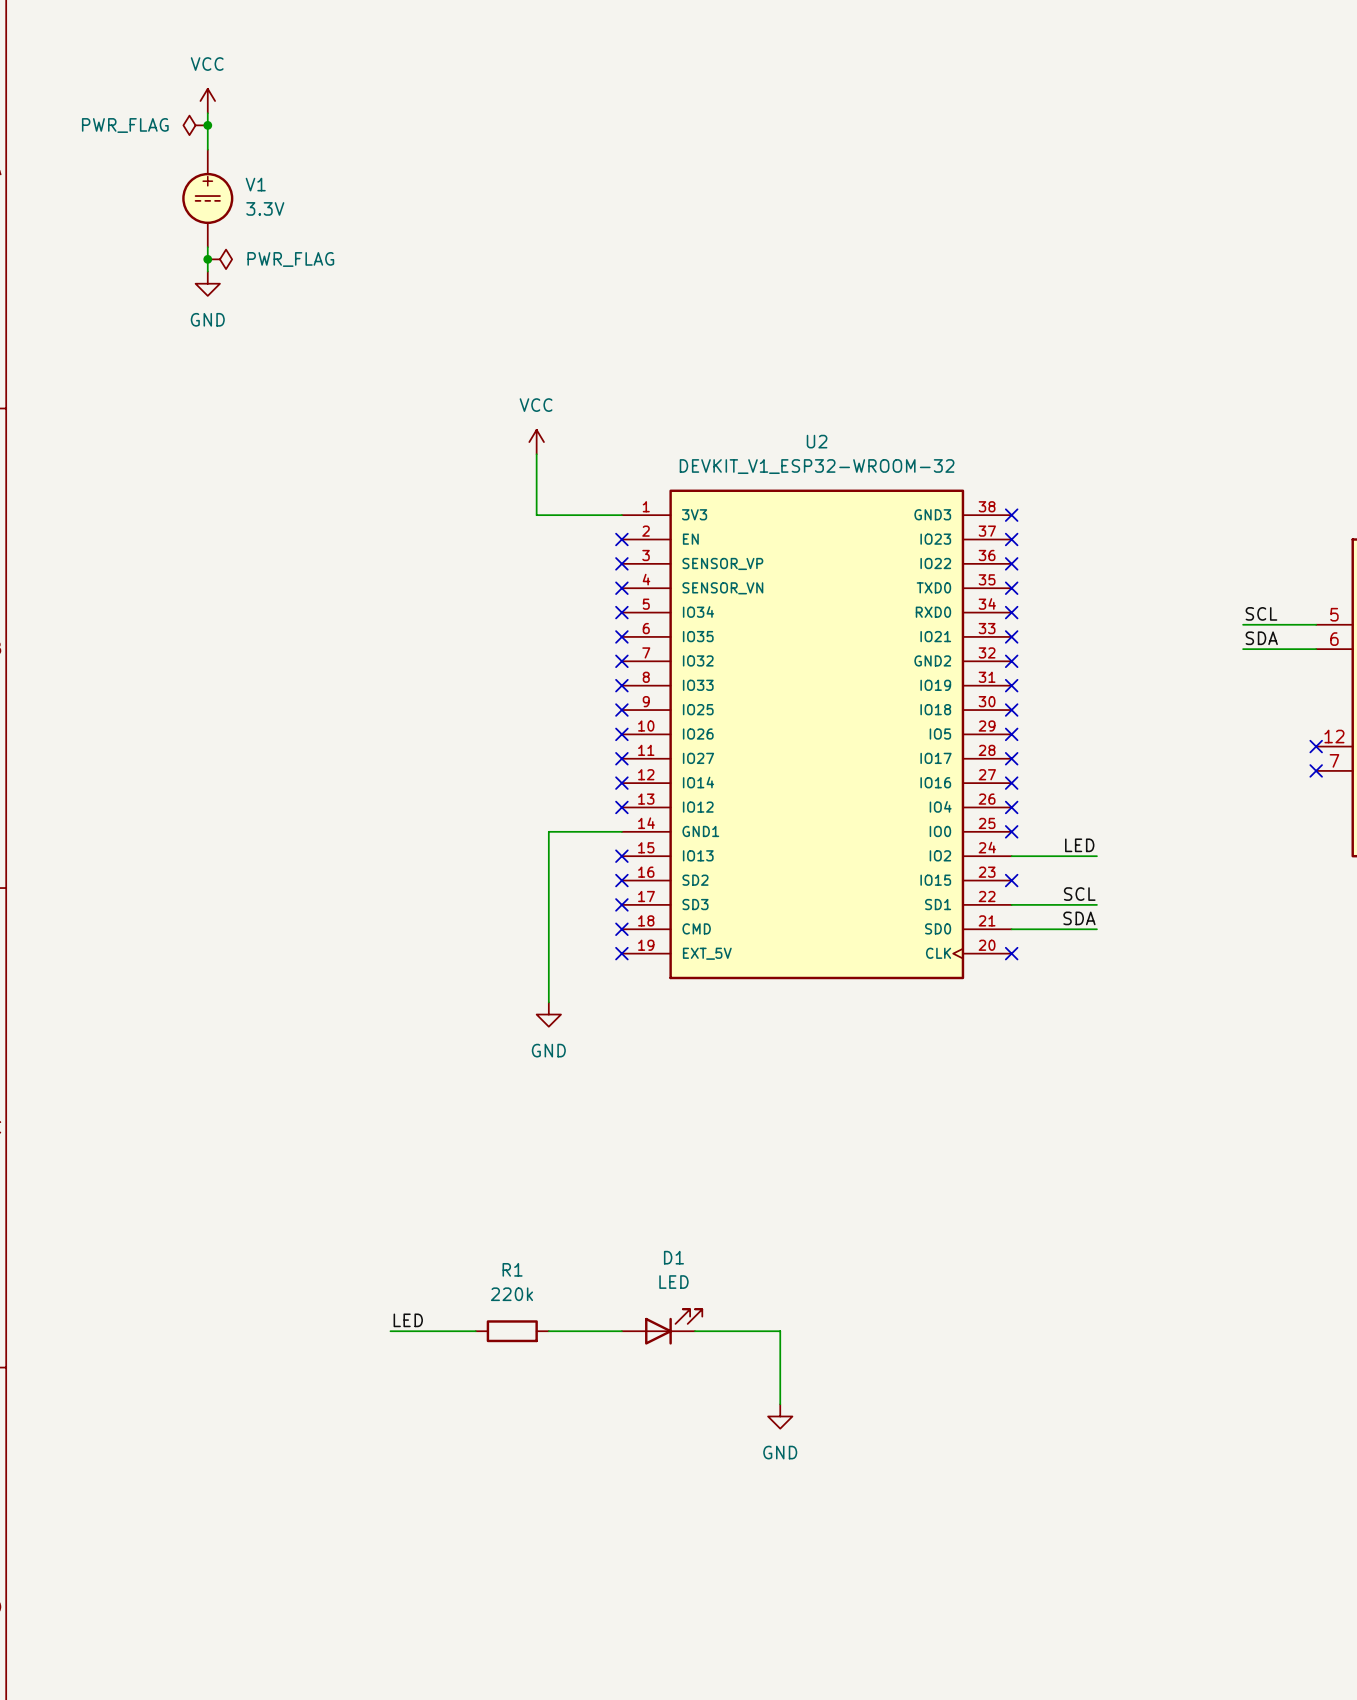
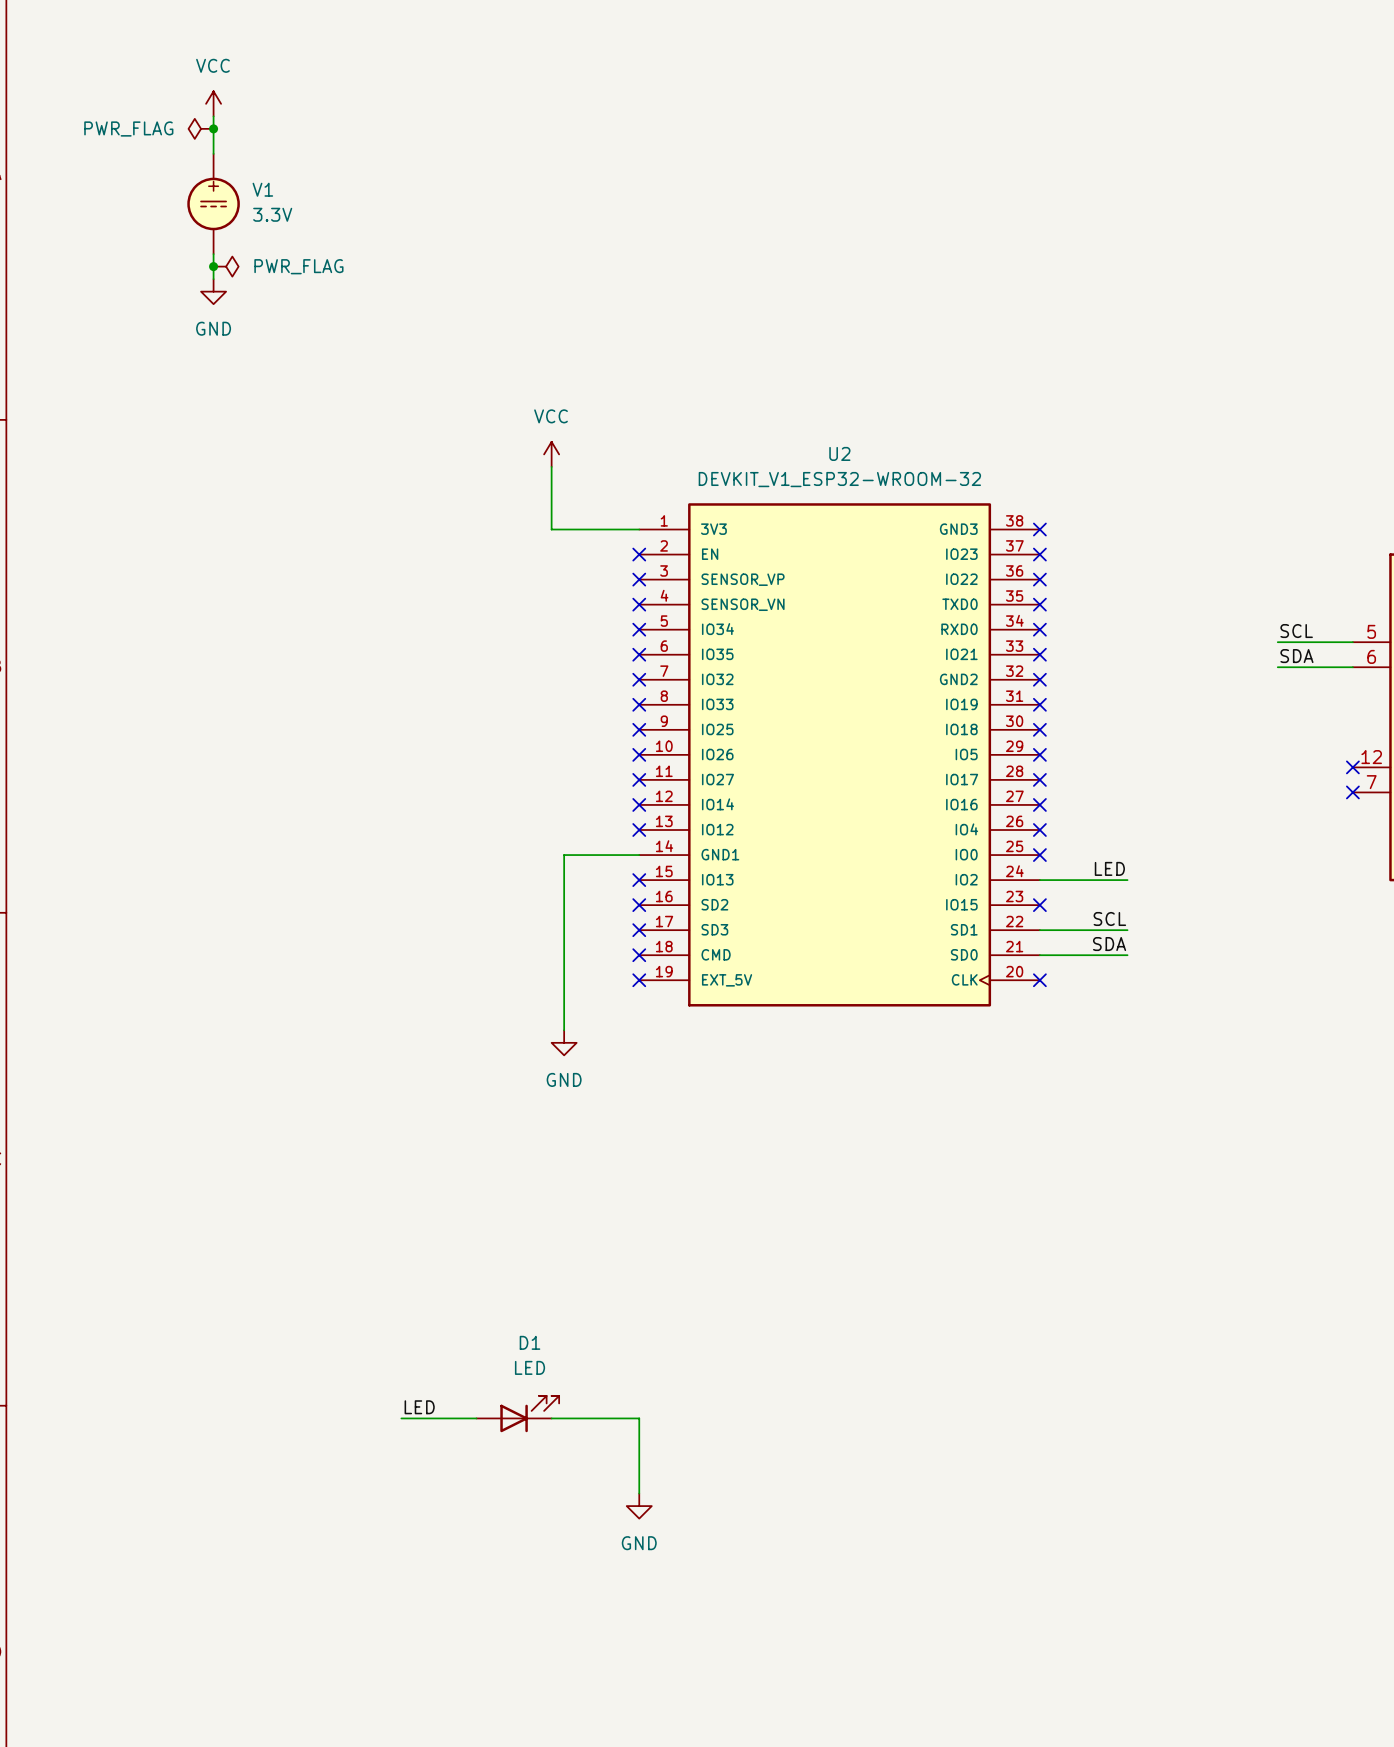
label position: LED (408, 1320) -> LED (419, 1407)
D1 position: (662, 1326) -> (517, 1414)
wire: (390, 1331) (475, 1331) -> none
R1: 220k (512, 1331) -> none
wire: (548, 1331) (621, 1331) -> (401, 1418) (476, 1418)
wire: (694, 1331) (780, 1331) (780, 1404) -> (551, 1418) (639, 1418) (639, 1493)
power symbol position: GND (780, 1416) -> GND (639, 1506)

